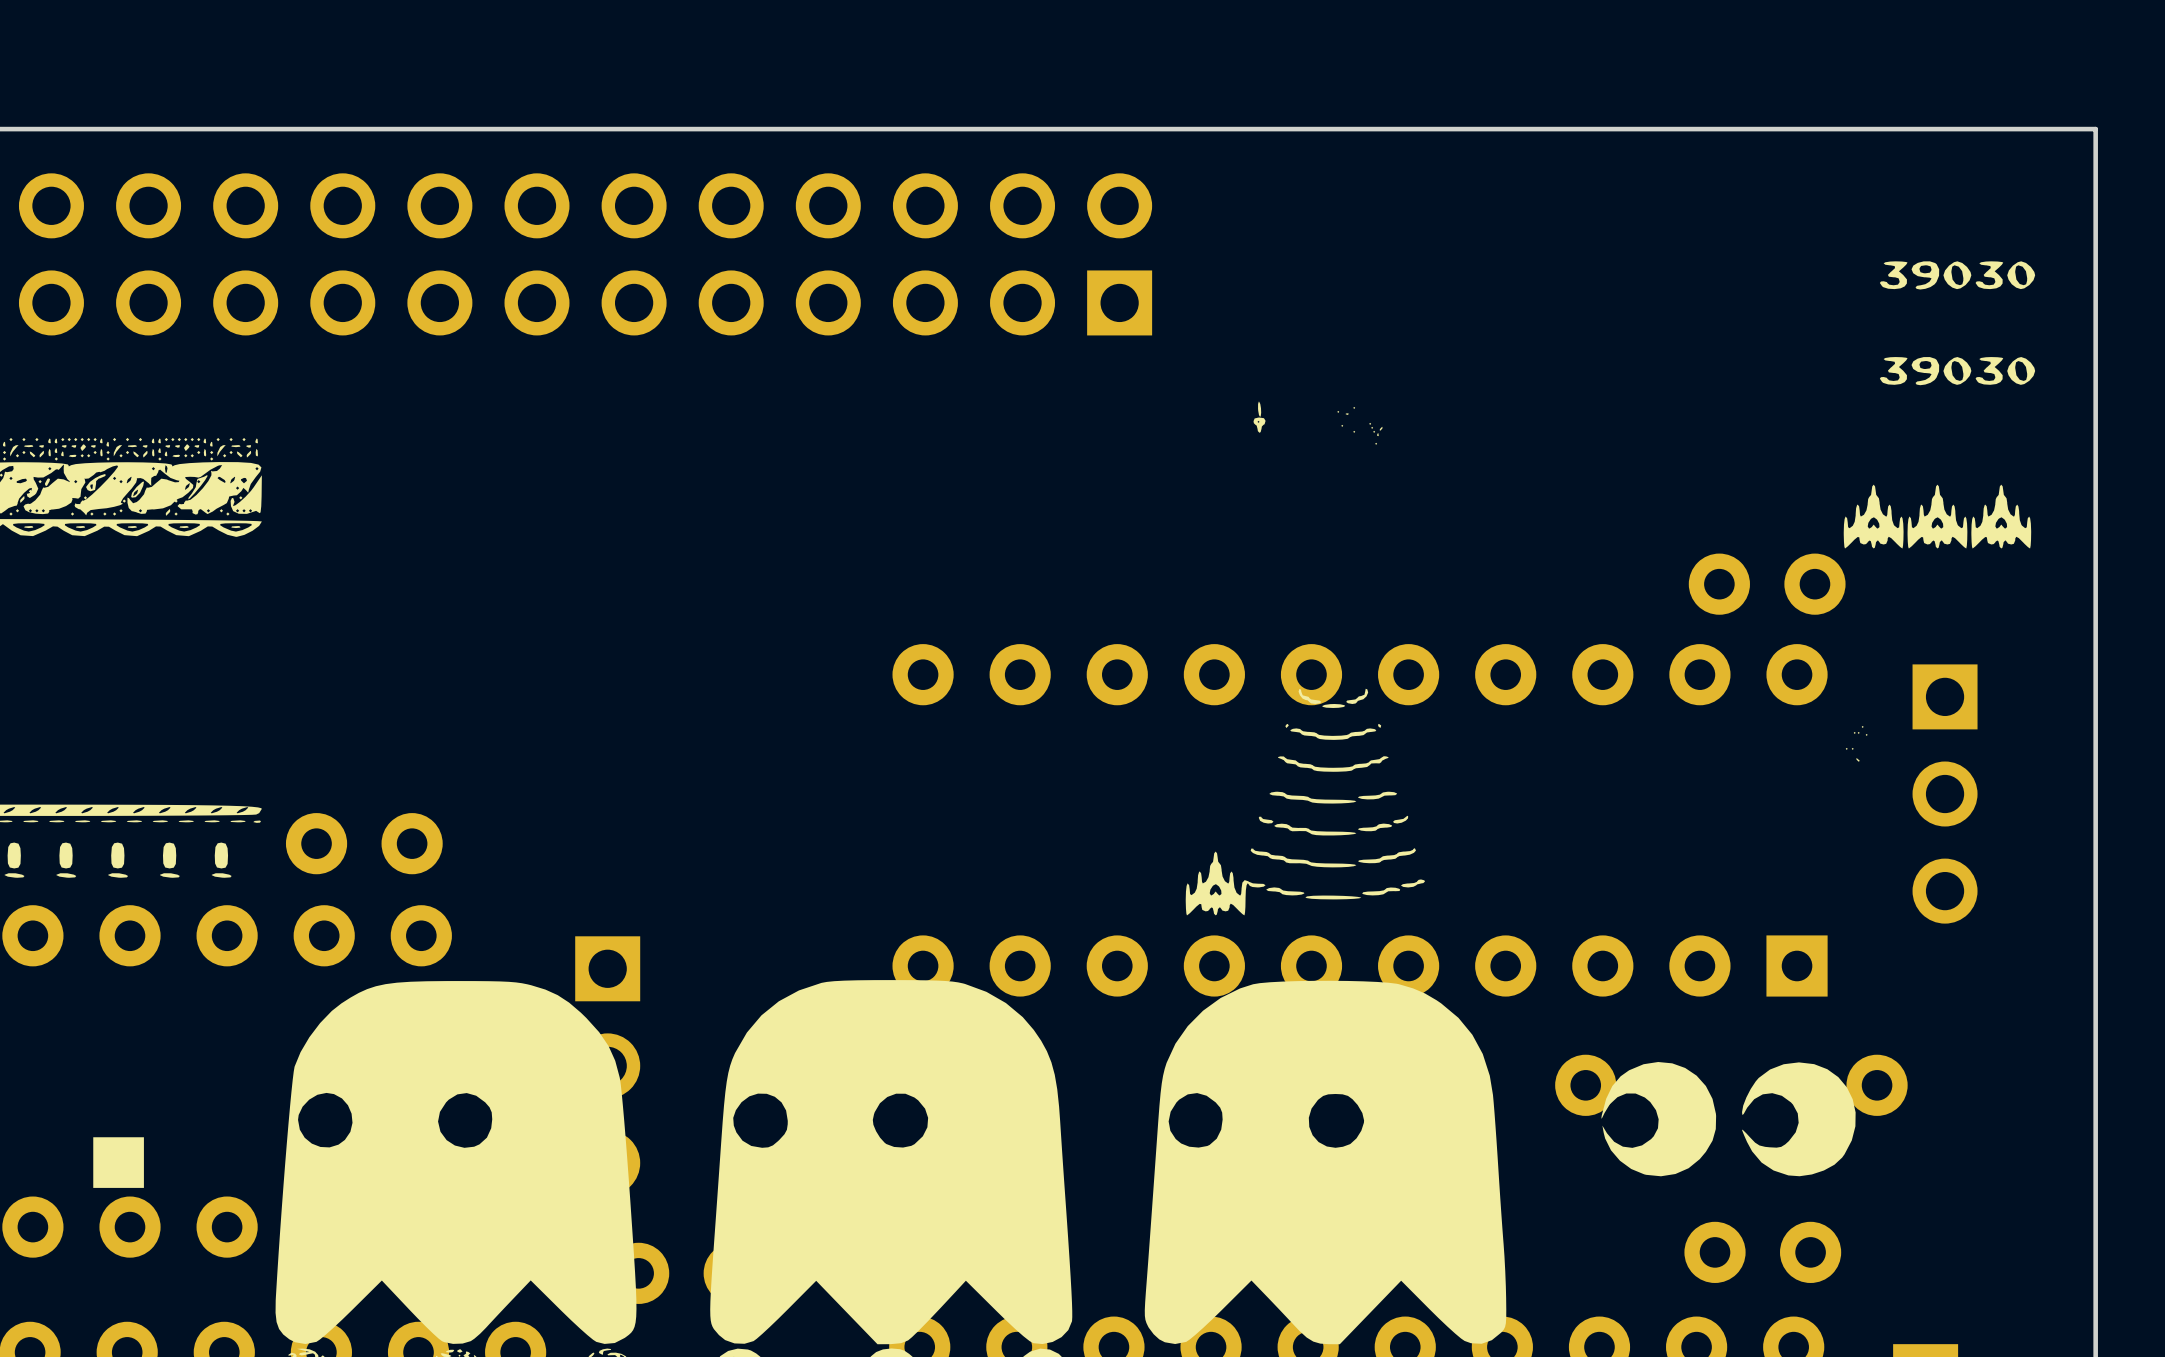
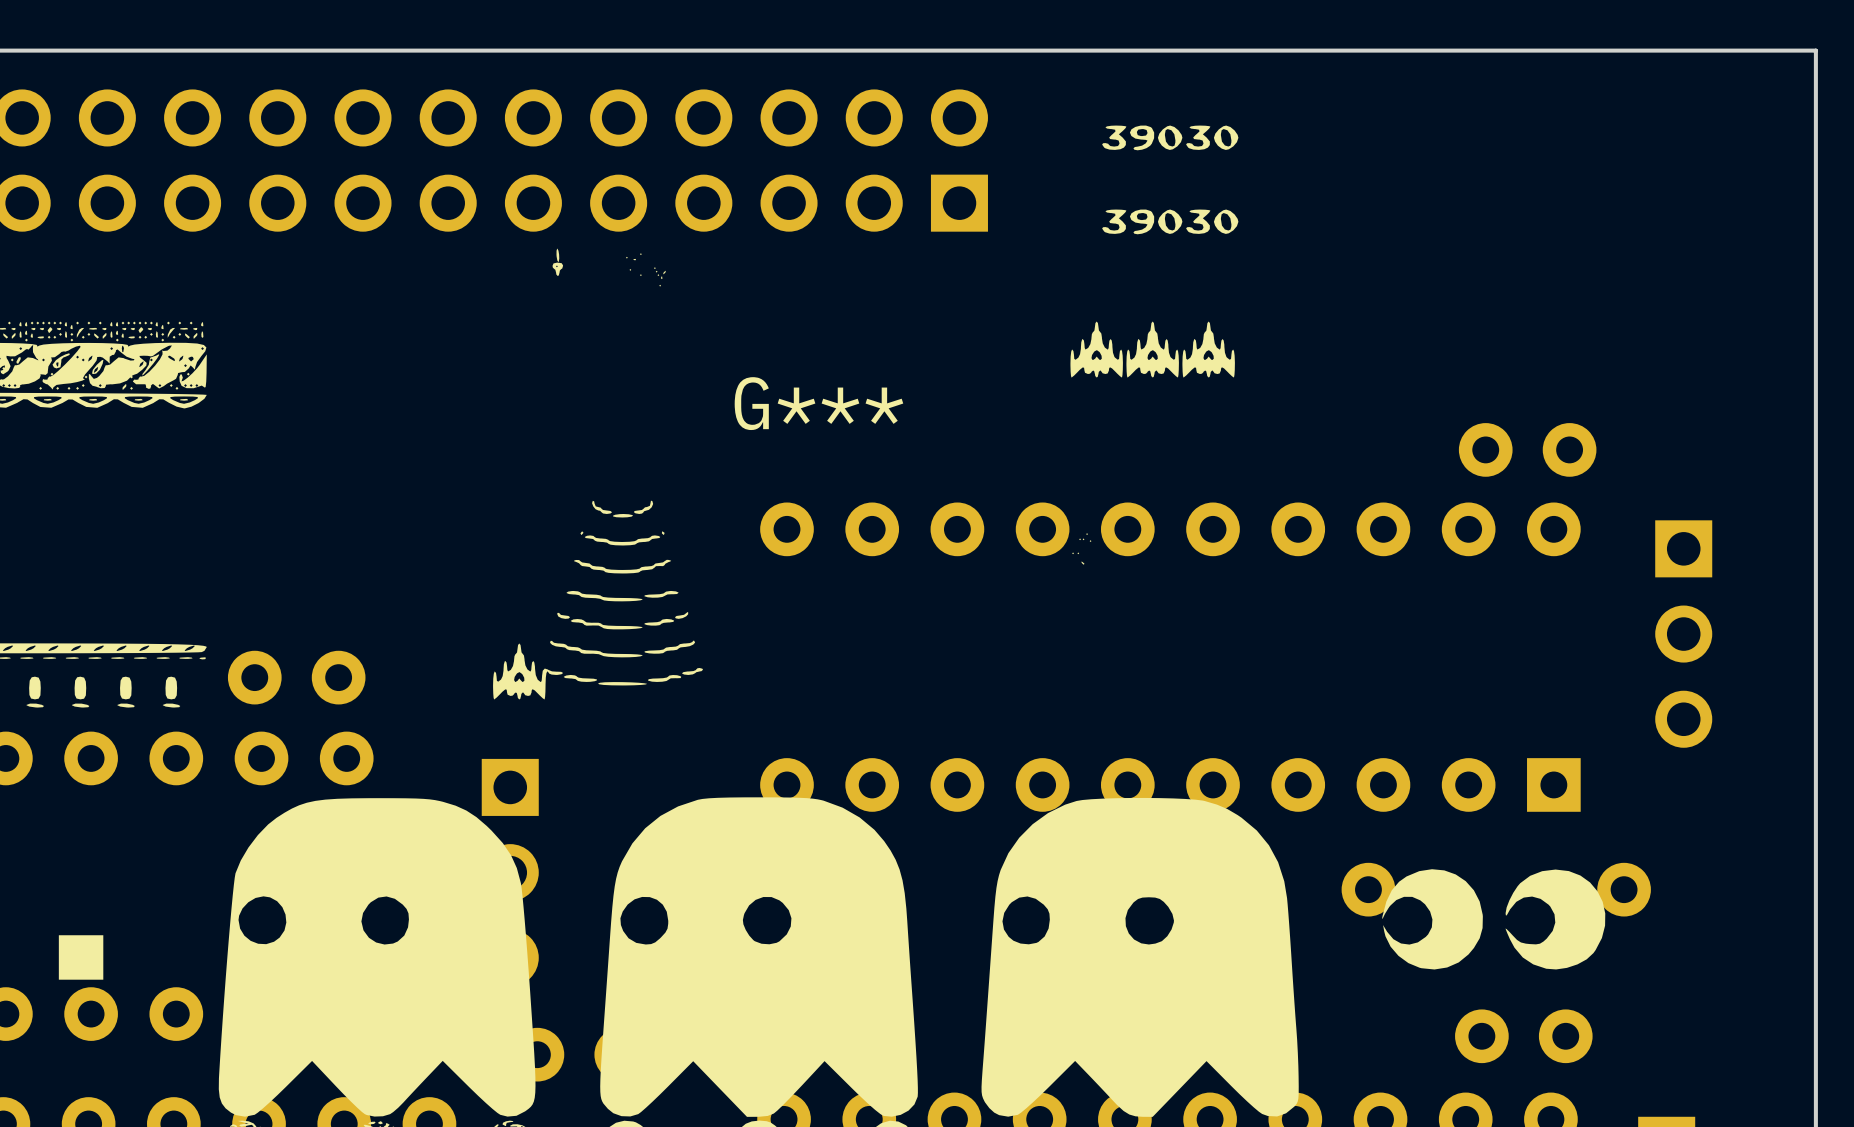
drawing: [1185, 261, 2036, 916] -> none
G***: none -> (865, 412)

